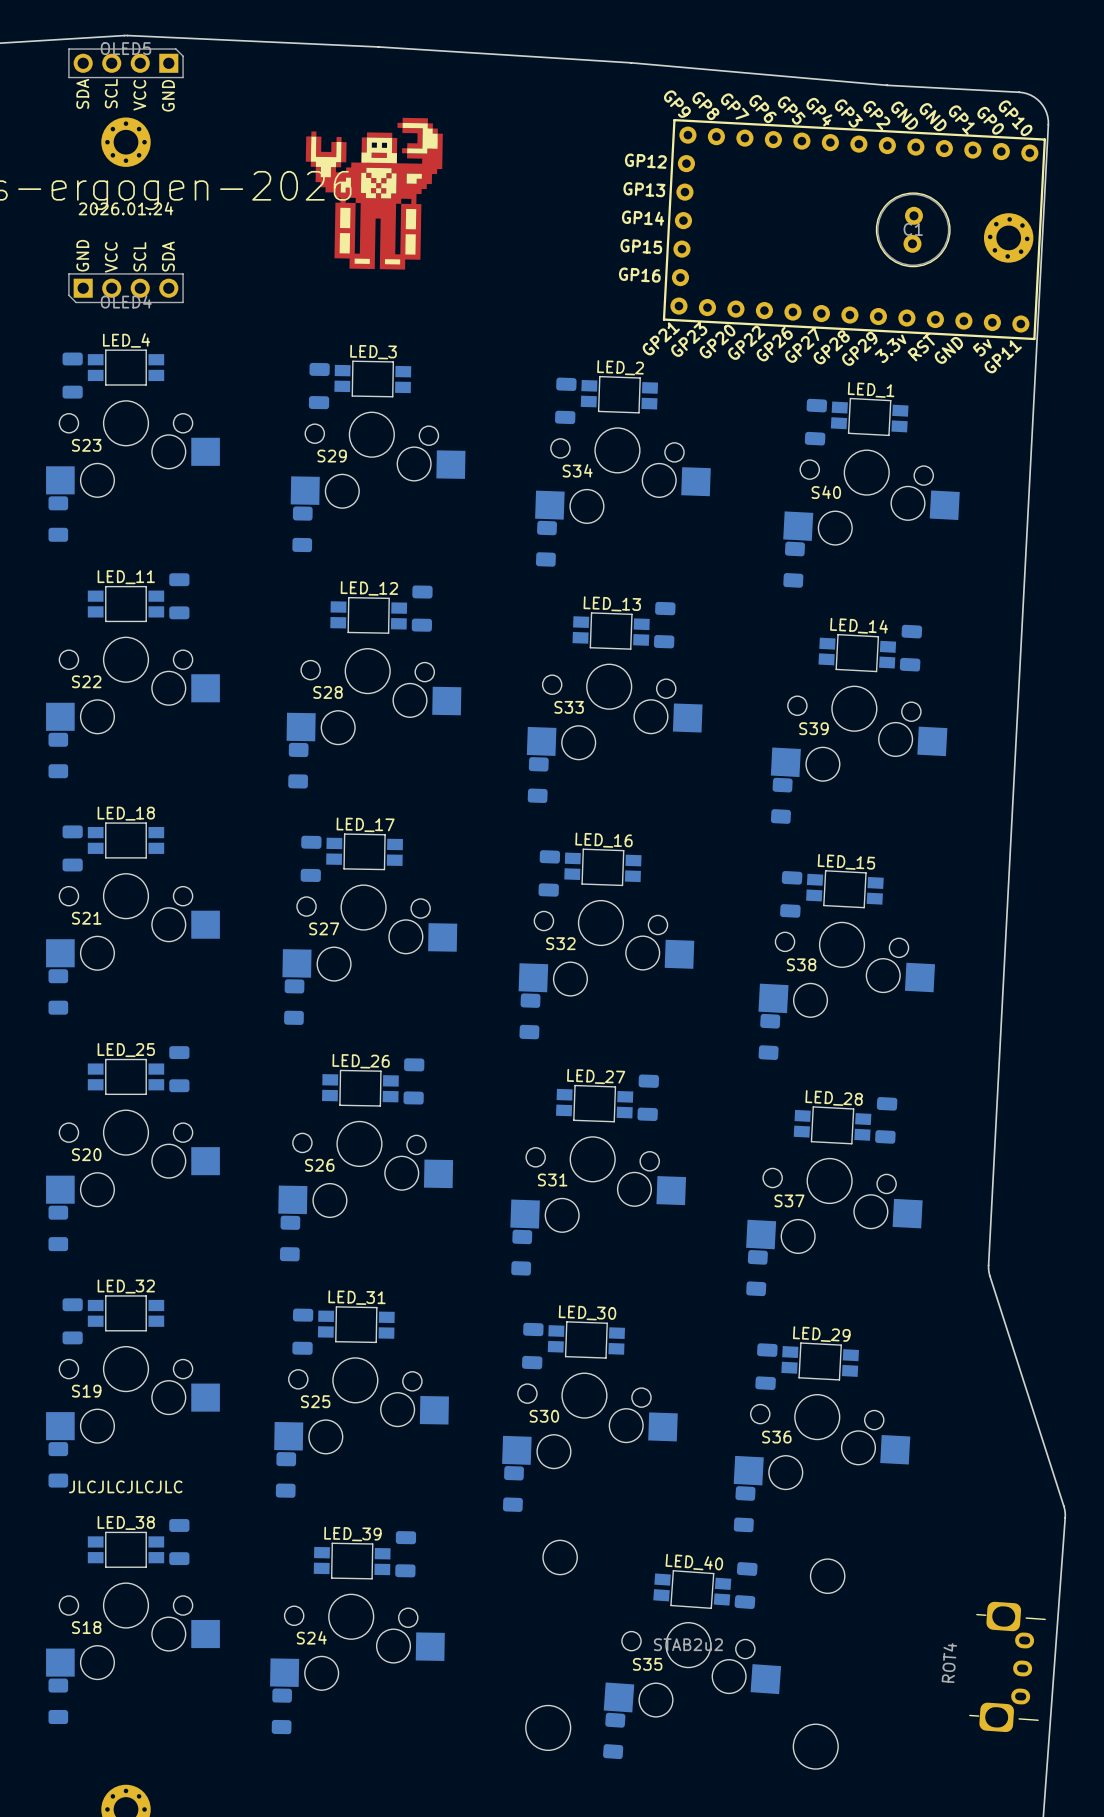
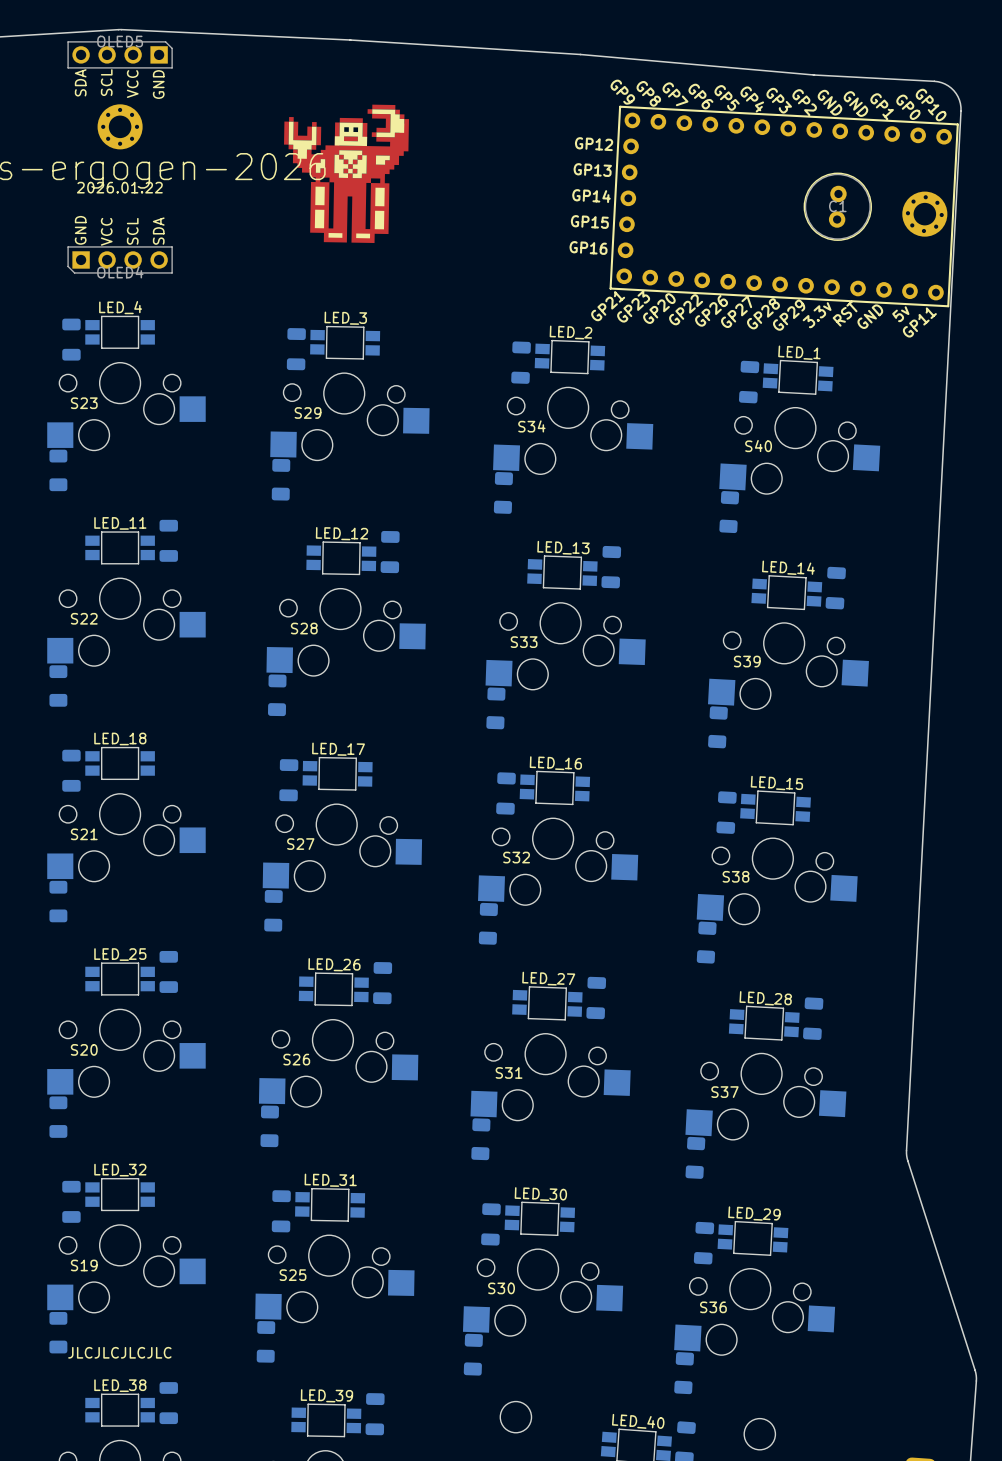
text: 2026.01.24 (125, 208) -> 2026.01.22 (119, 187)

